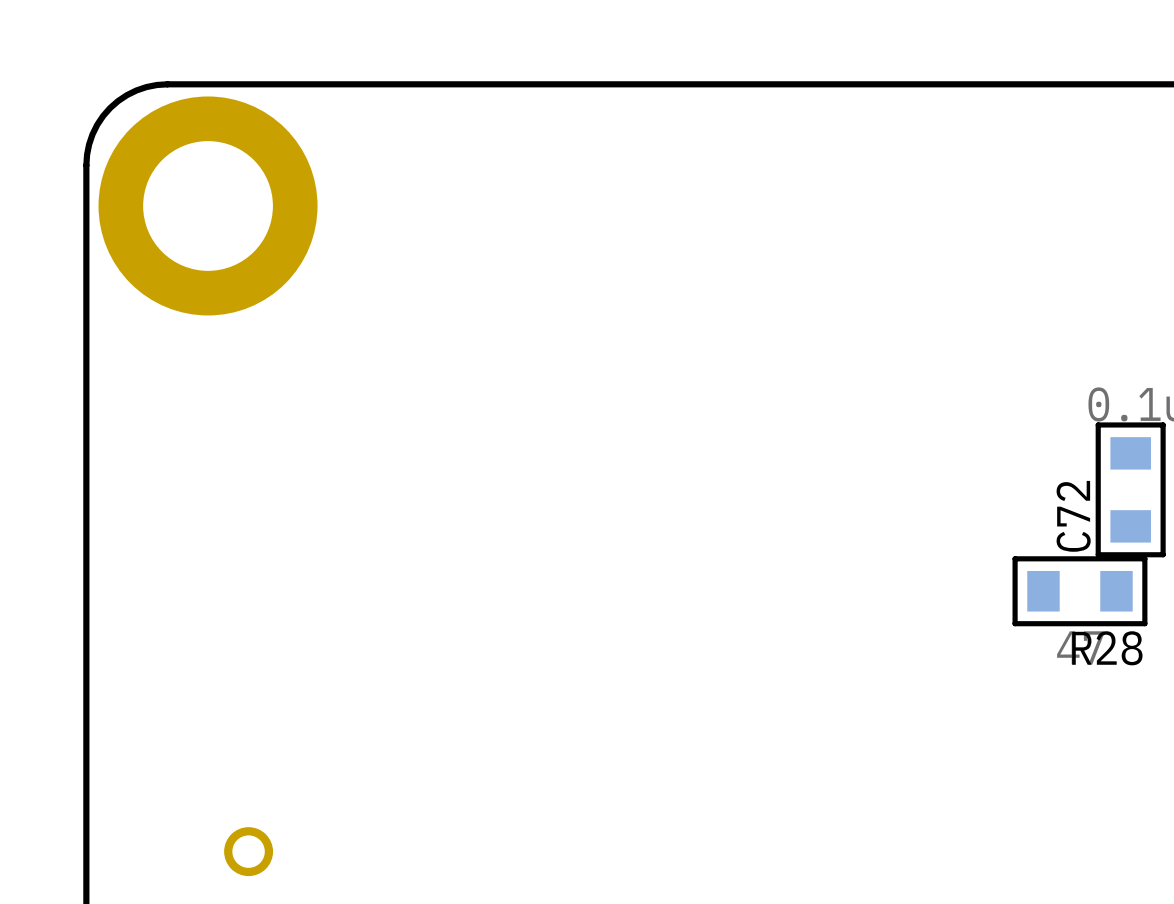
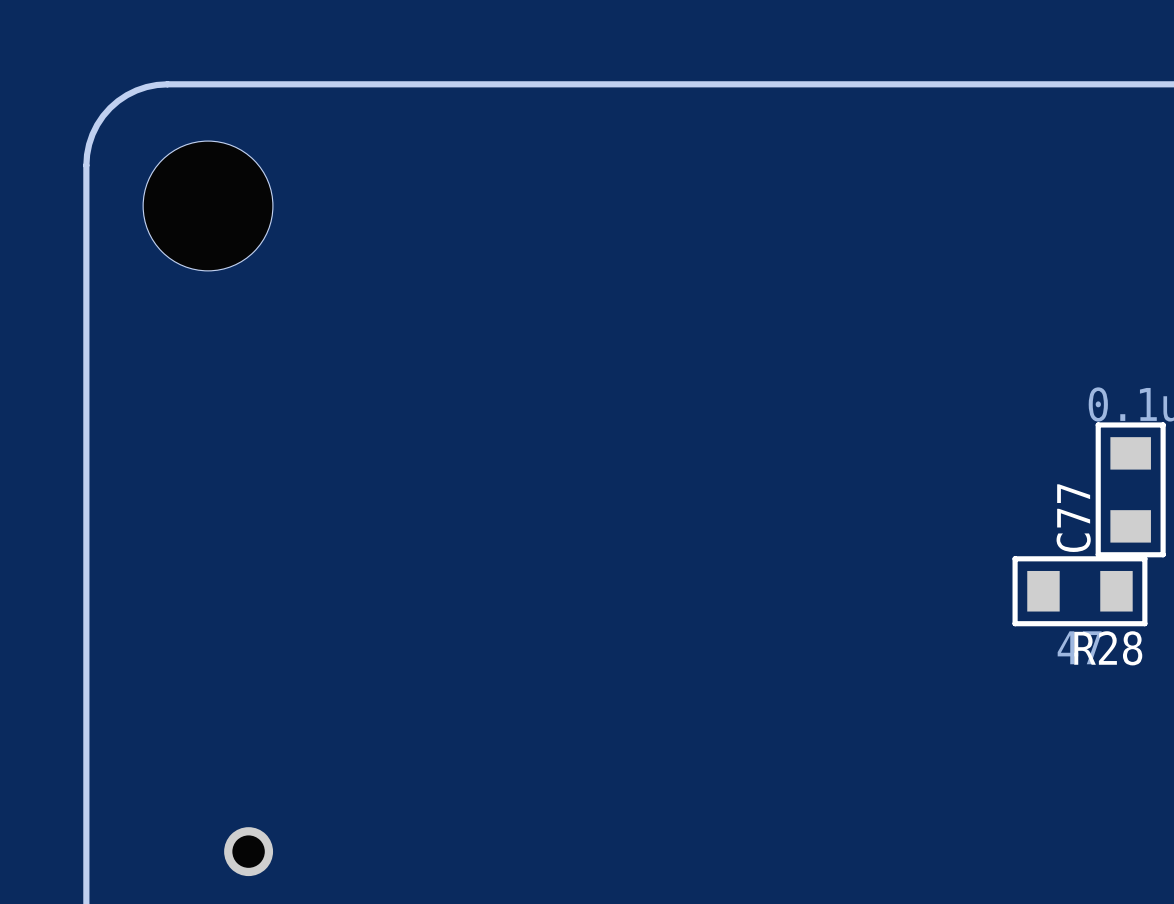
part footprint: [98, 96, 318, 316] -> [143, 141, 273, 271]
C72 name: C72 (1073, 516) -> C77 (1073, 518)

